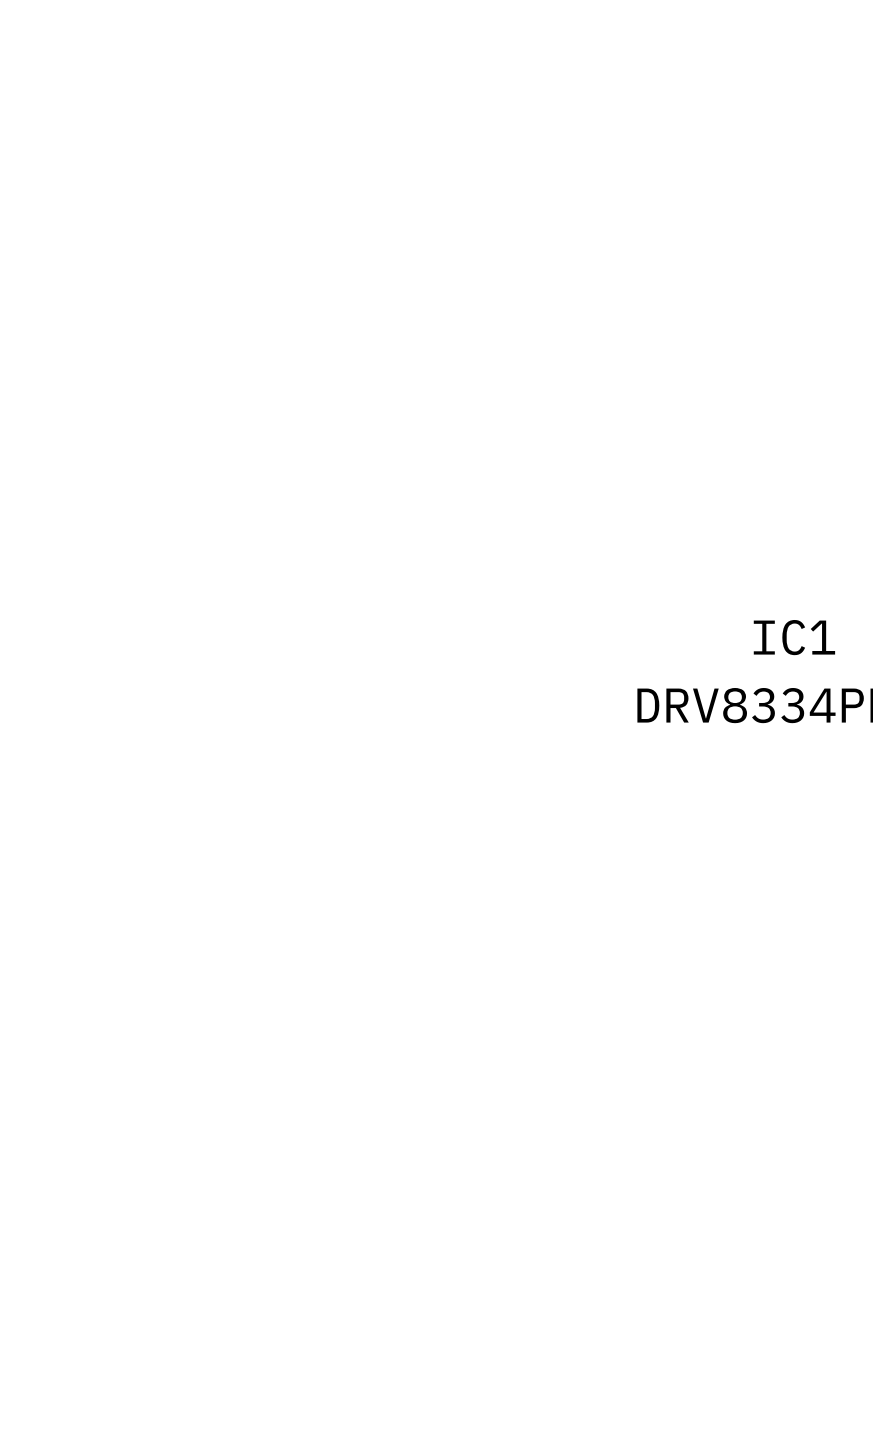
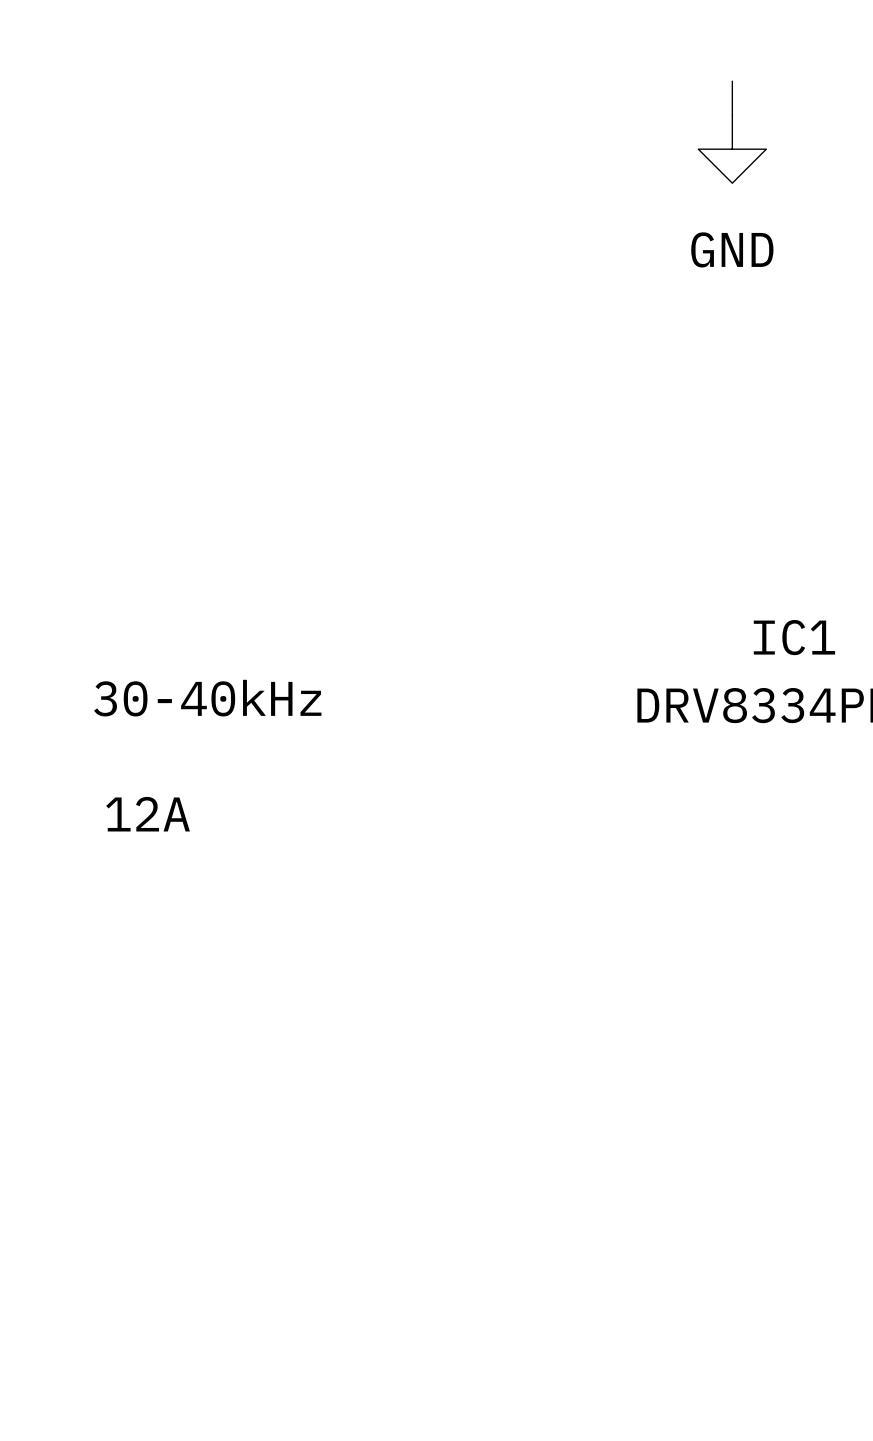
wire: none -> (732, 81) (732, 115)
power symbol: none -> GND (732, 149)
text: none -> 30-40kHz (207, 698)
text: none -> 12A (148, 814)

